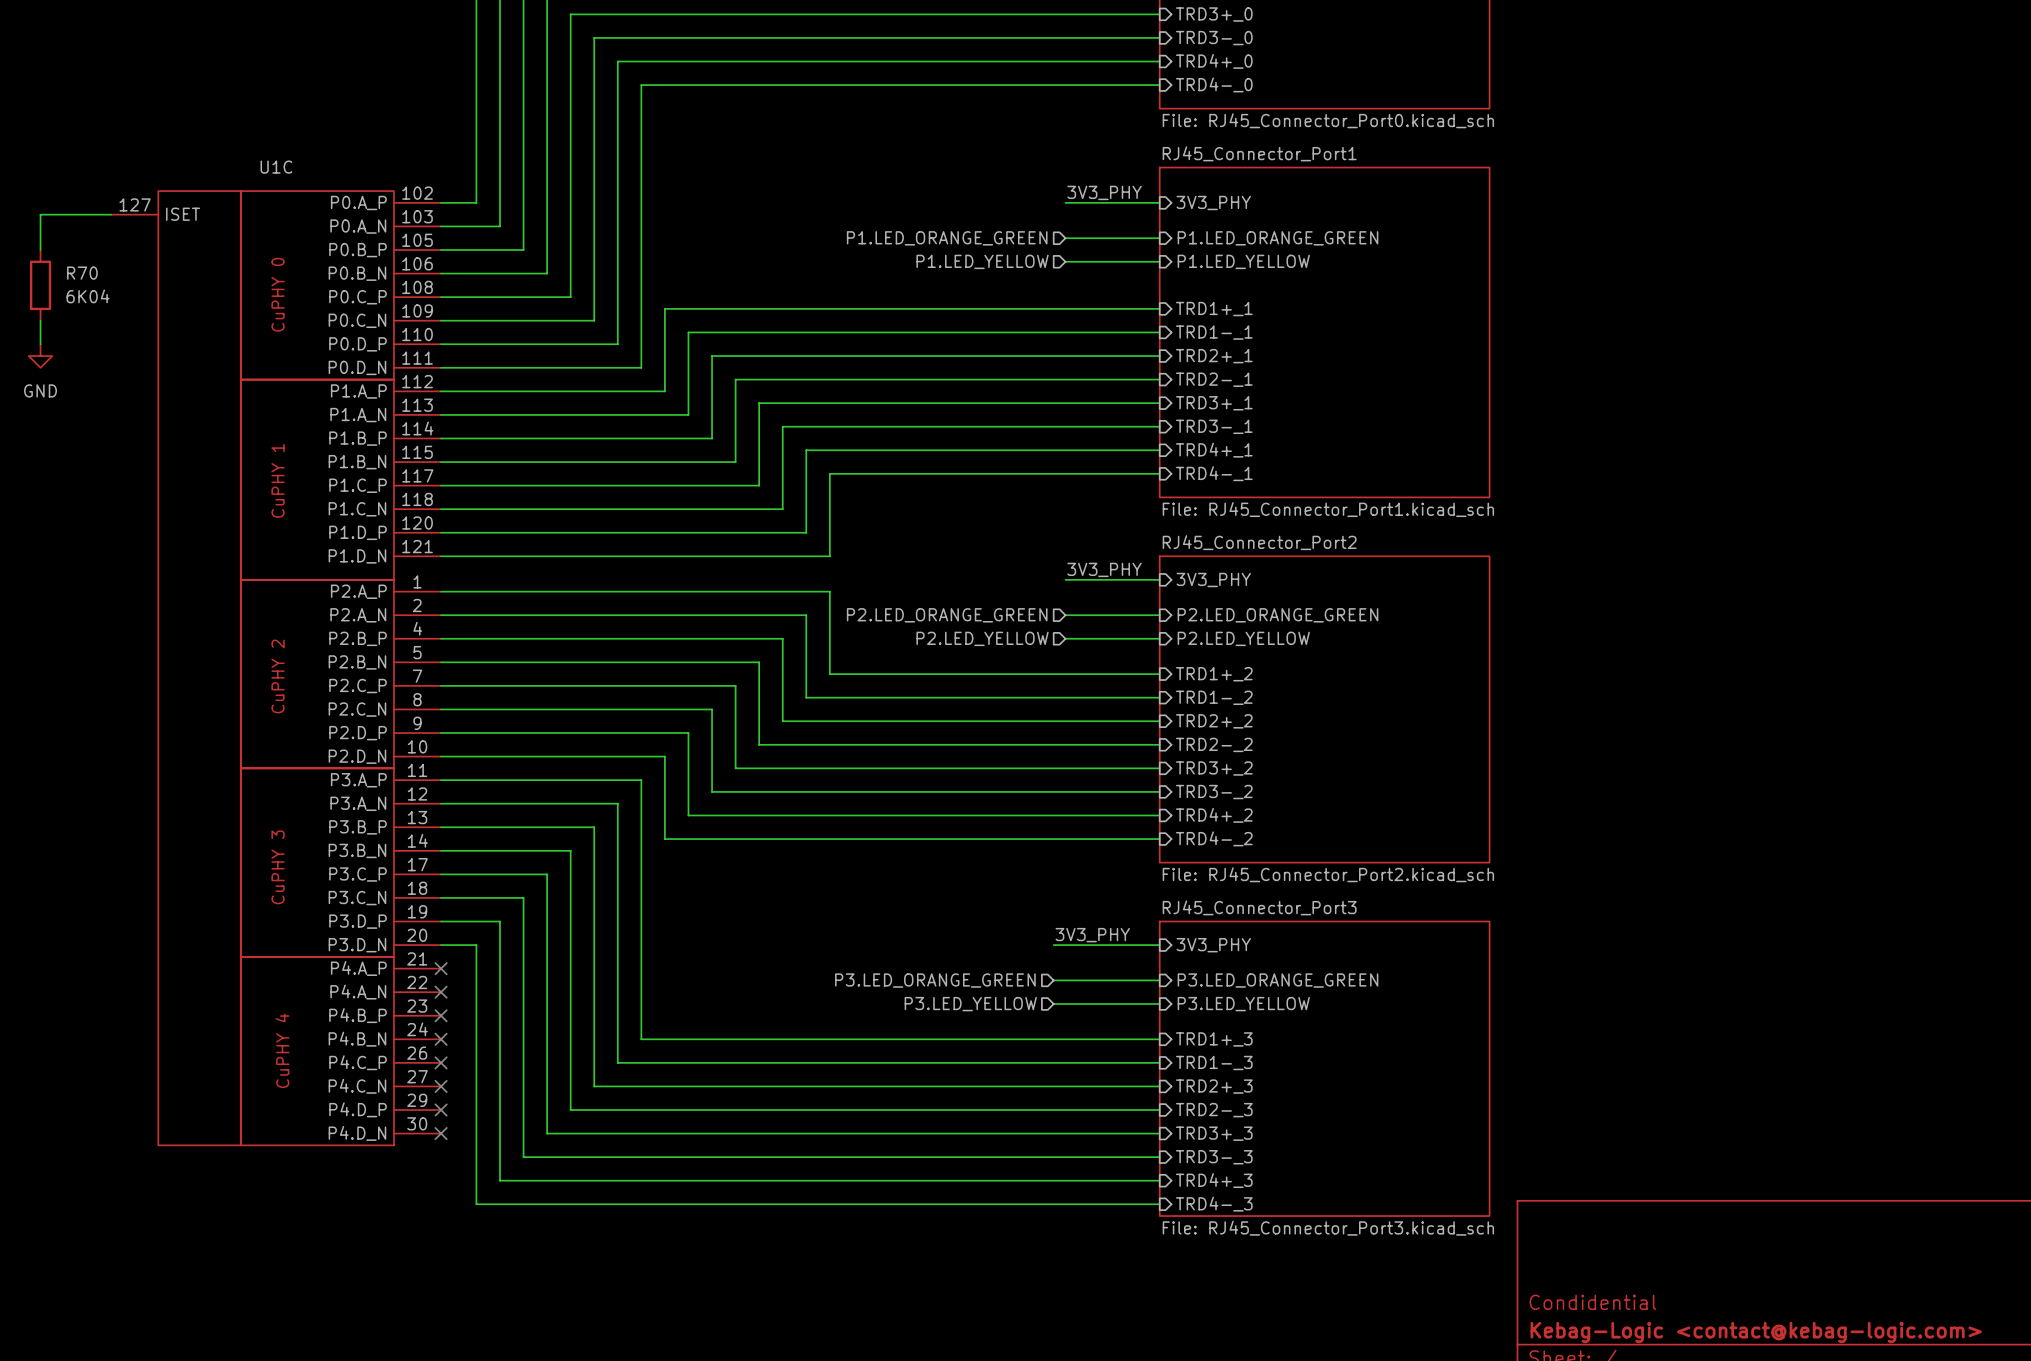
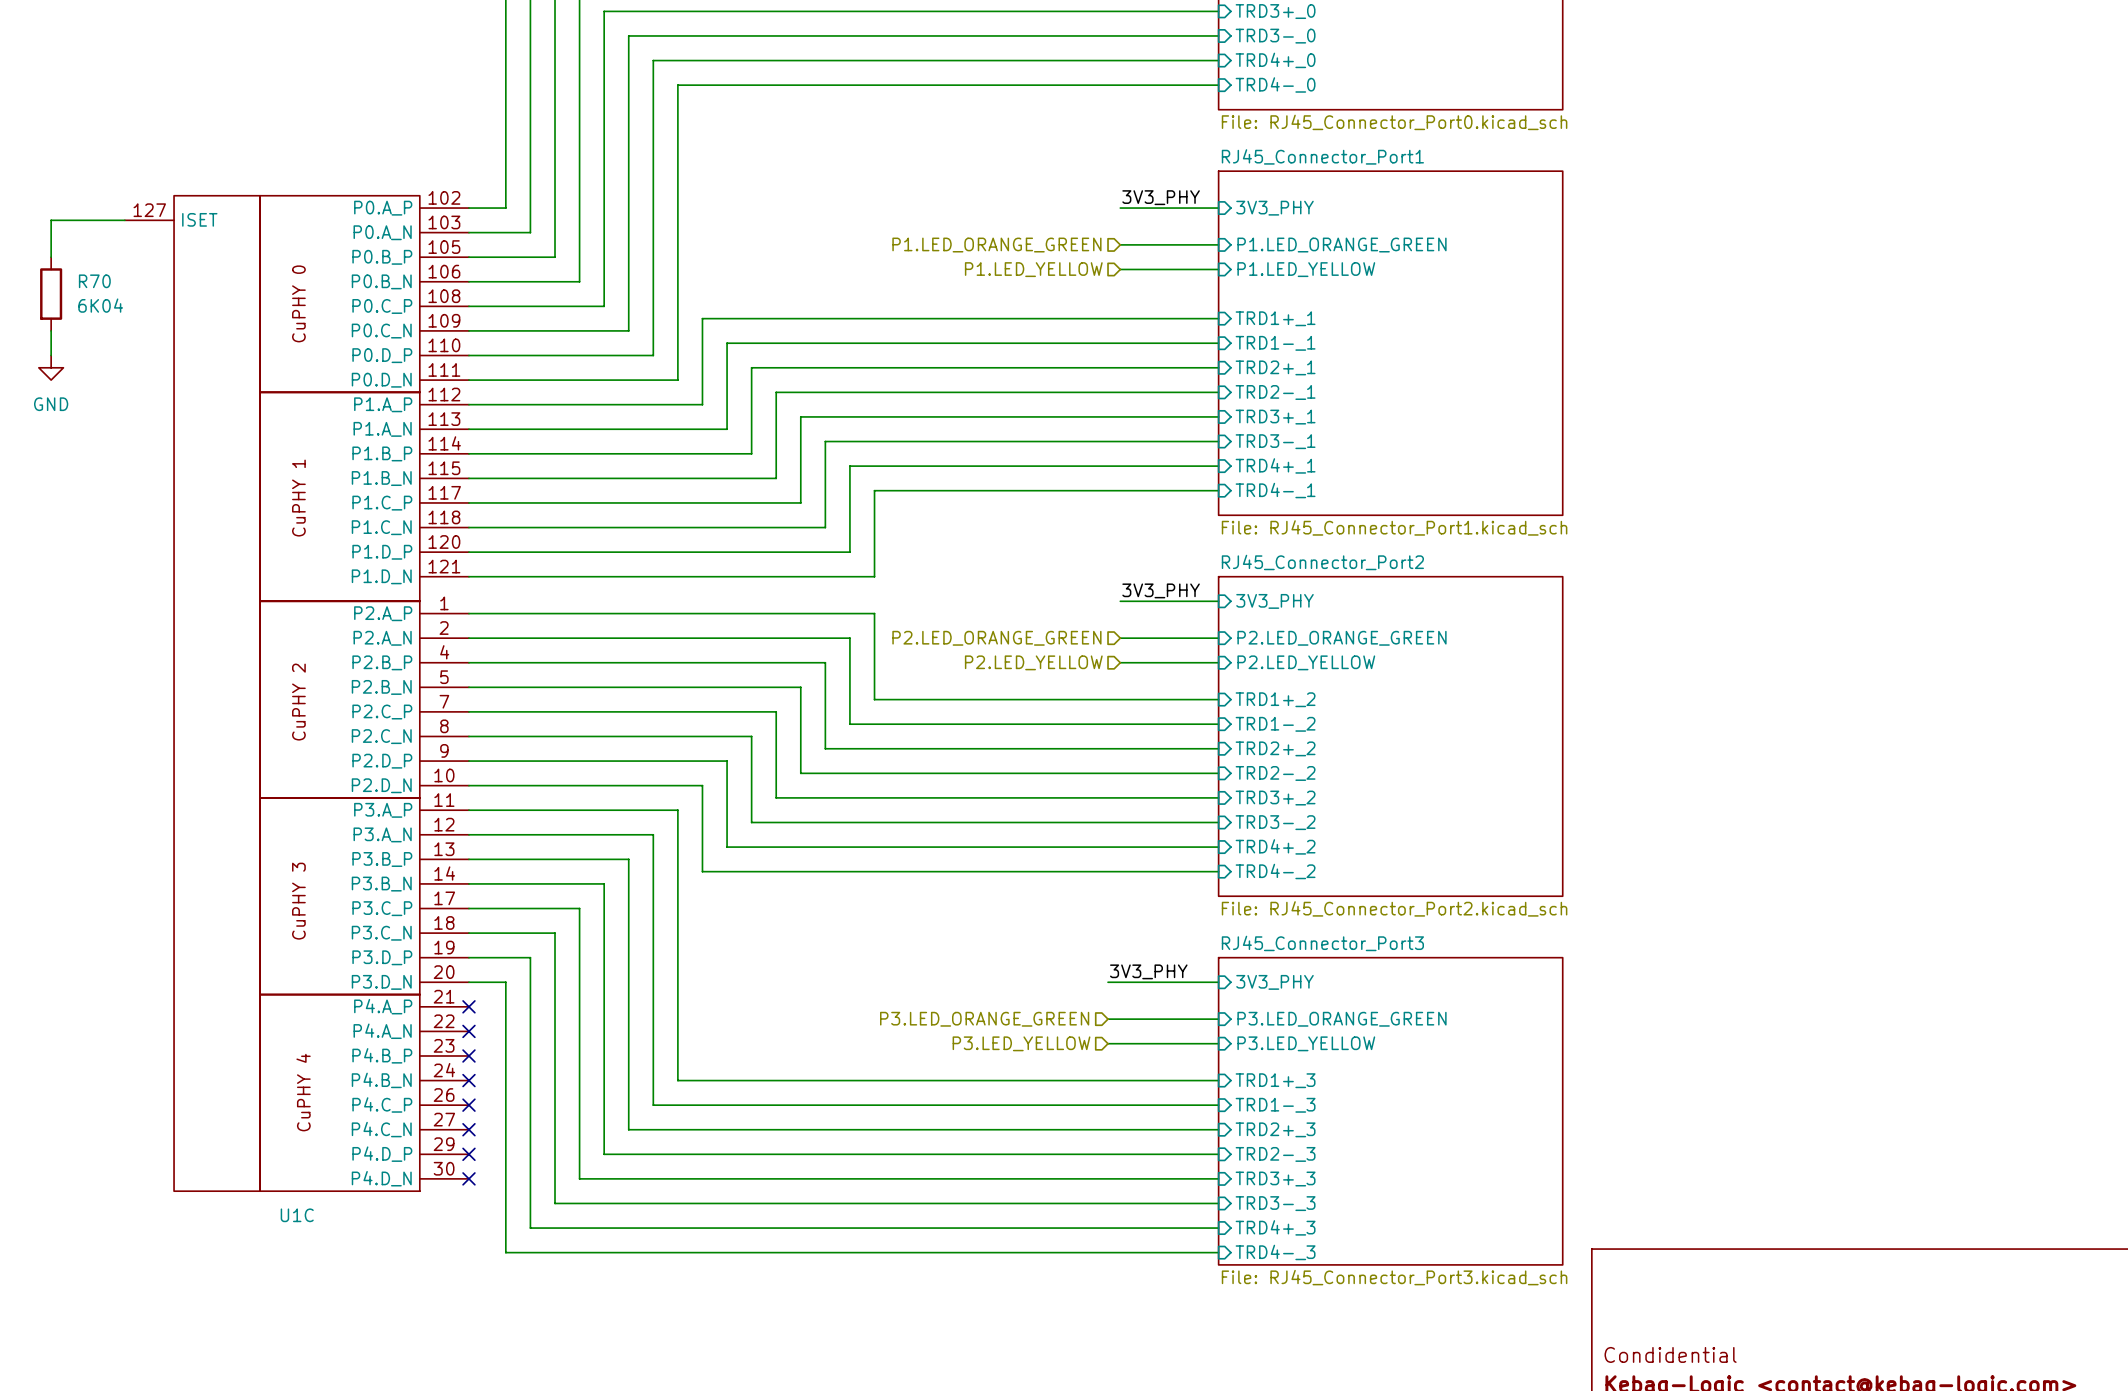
U1C name position: U1C (276, 167) -> U1C (297, 1215)

